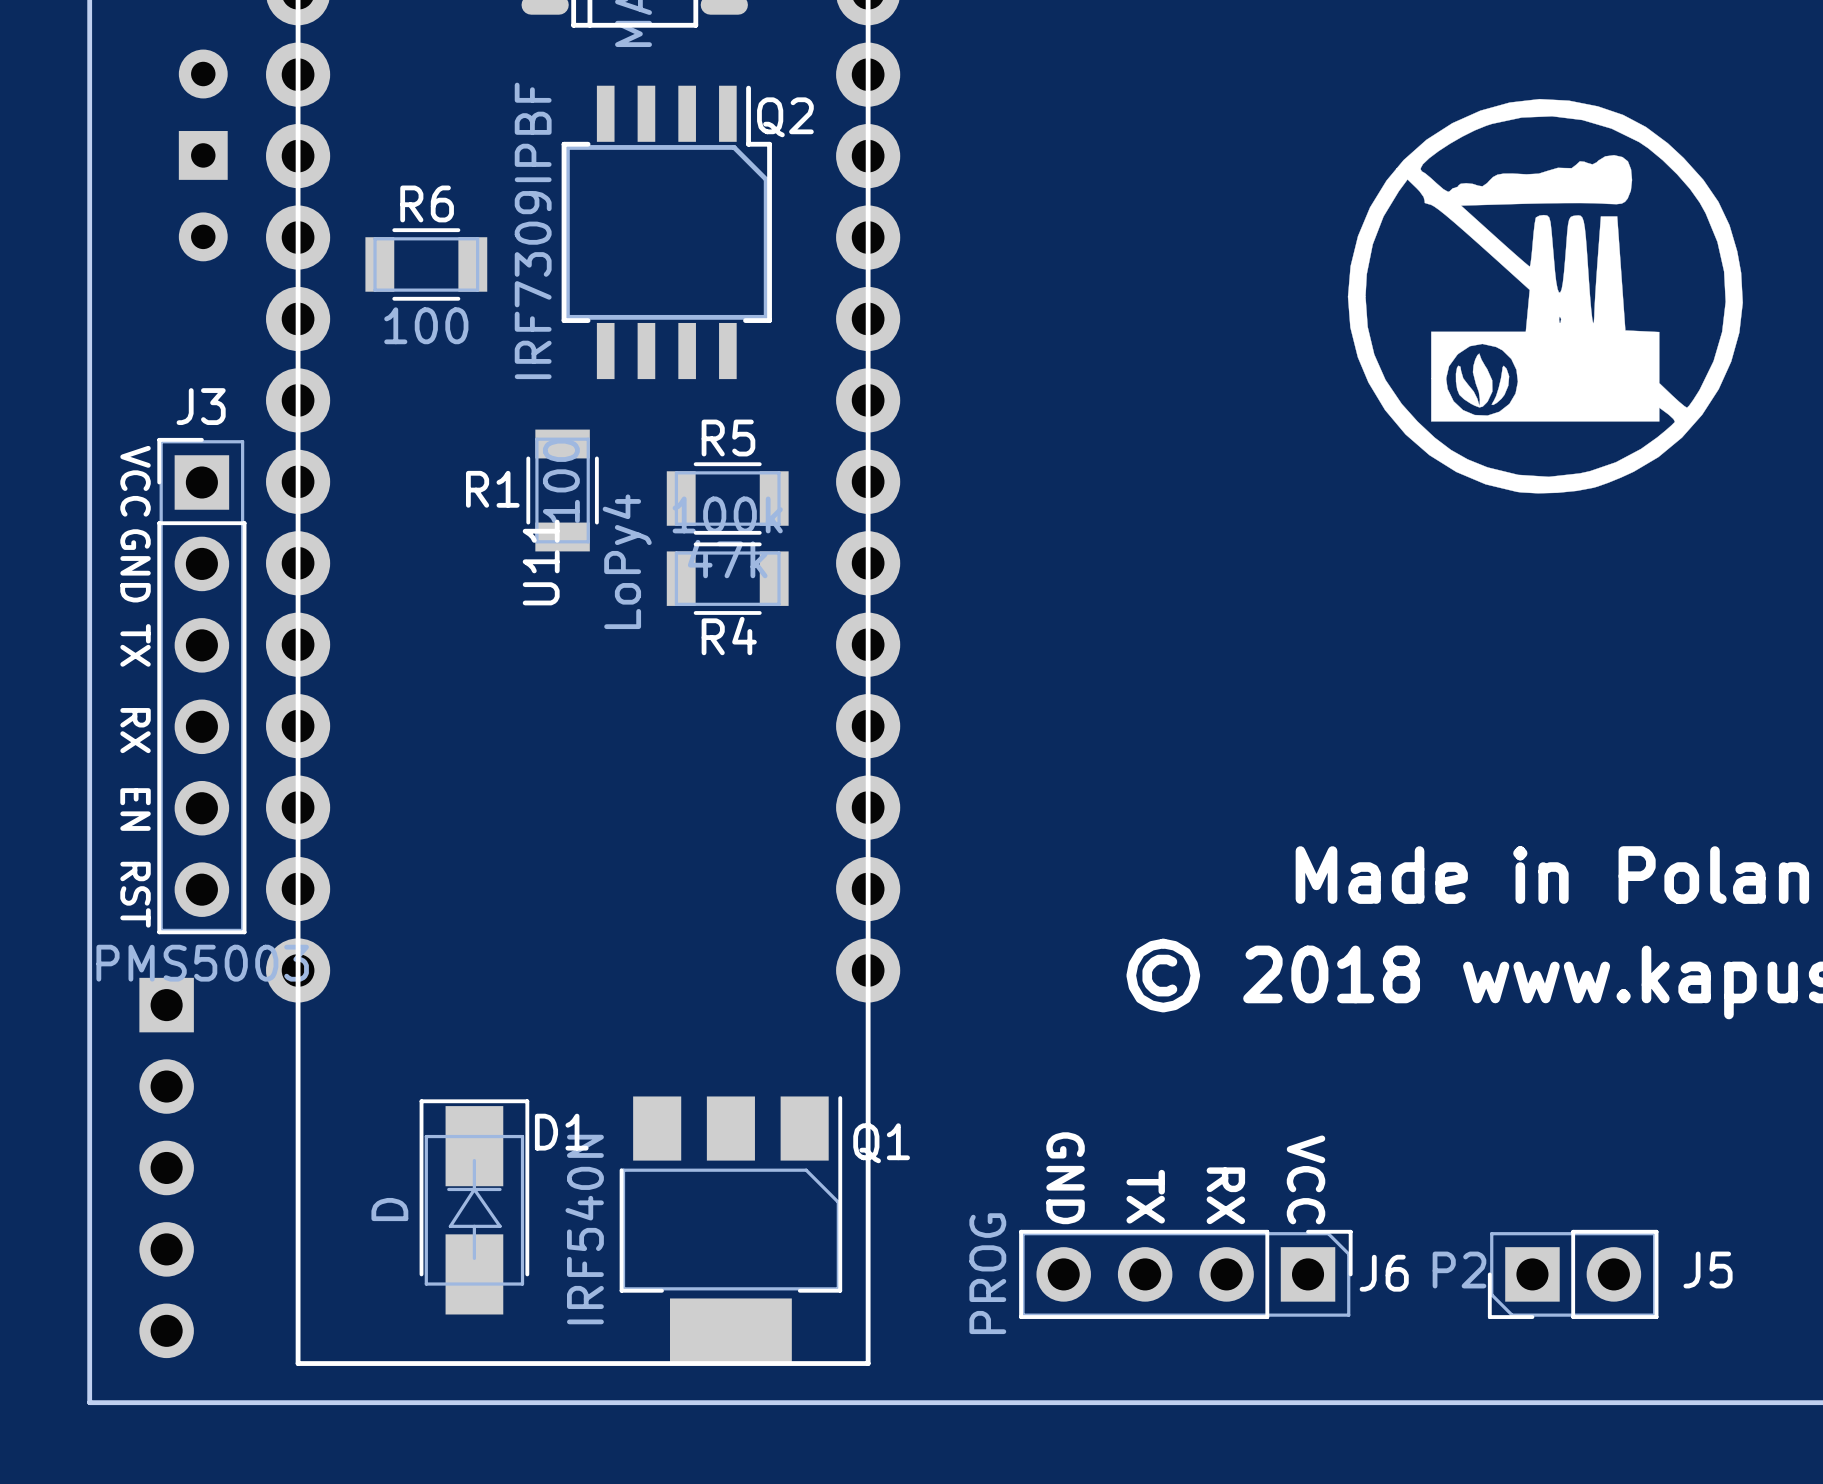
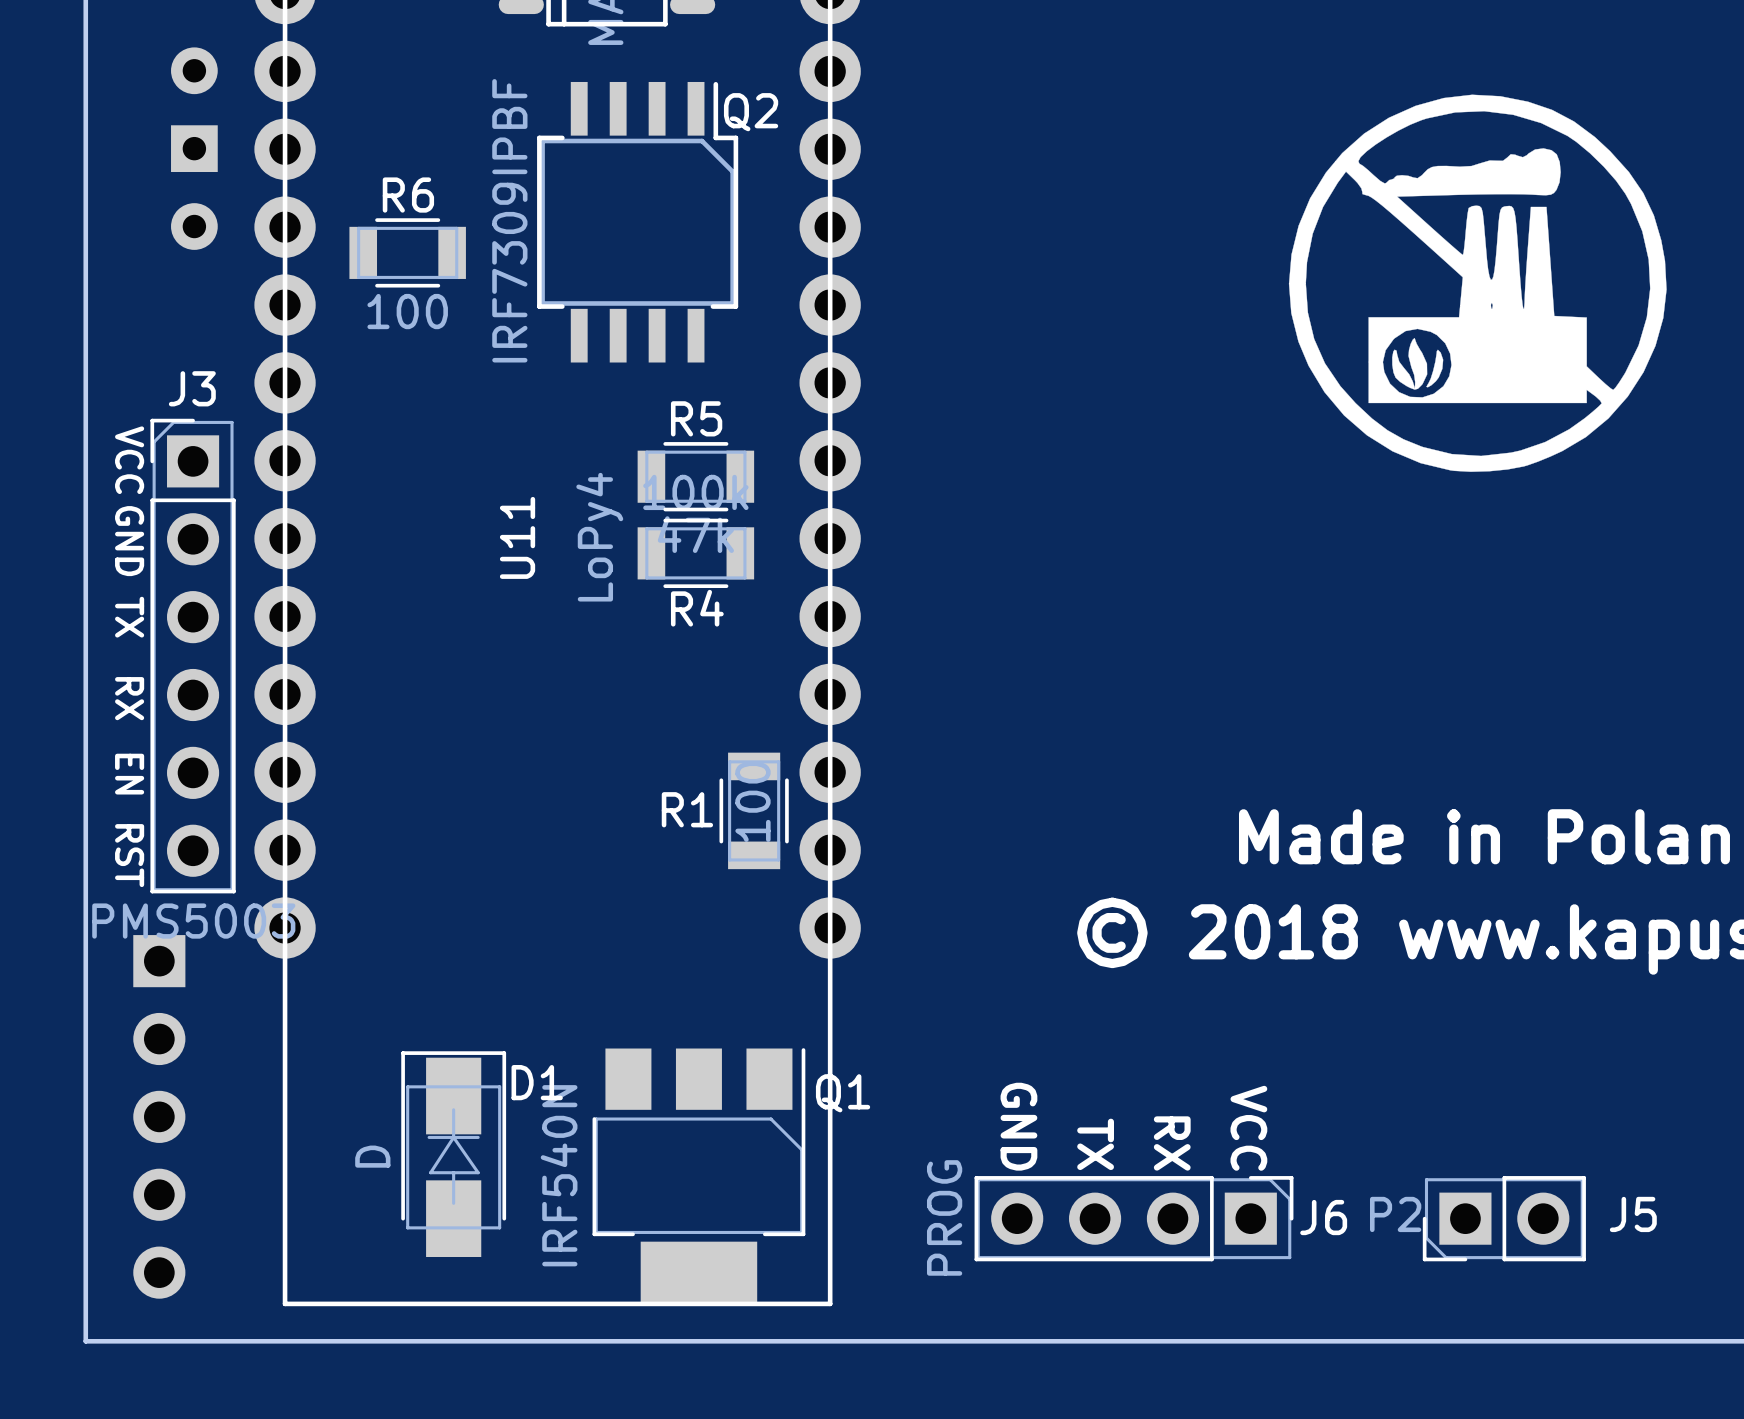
J3 footprint: [157, 437, 247, 935] -> [150, 418, 236, 894]
R1 position: (562, 490) -> (754, 810)

